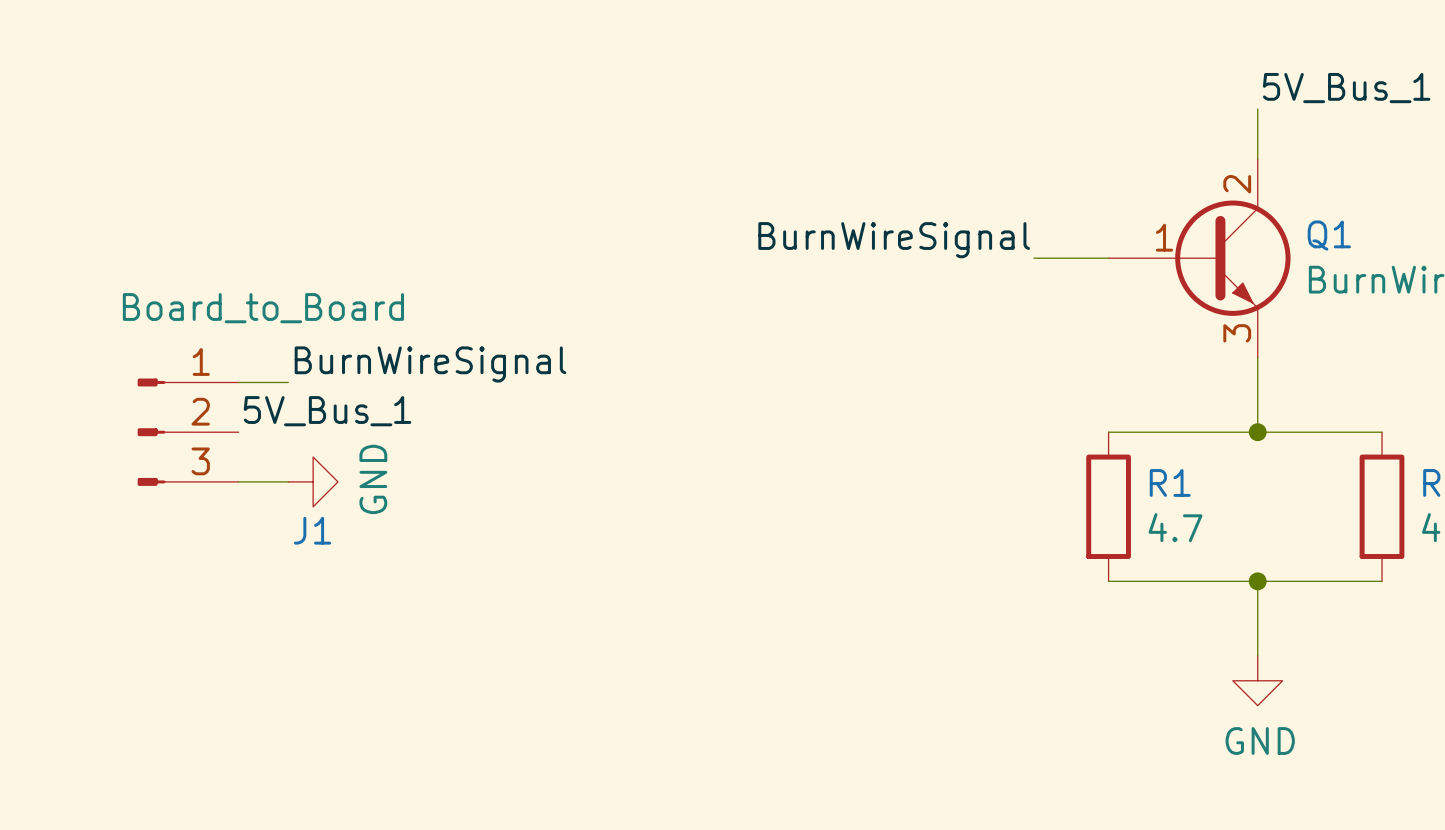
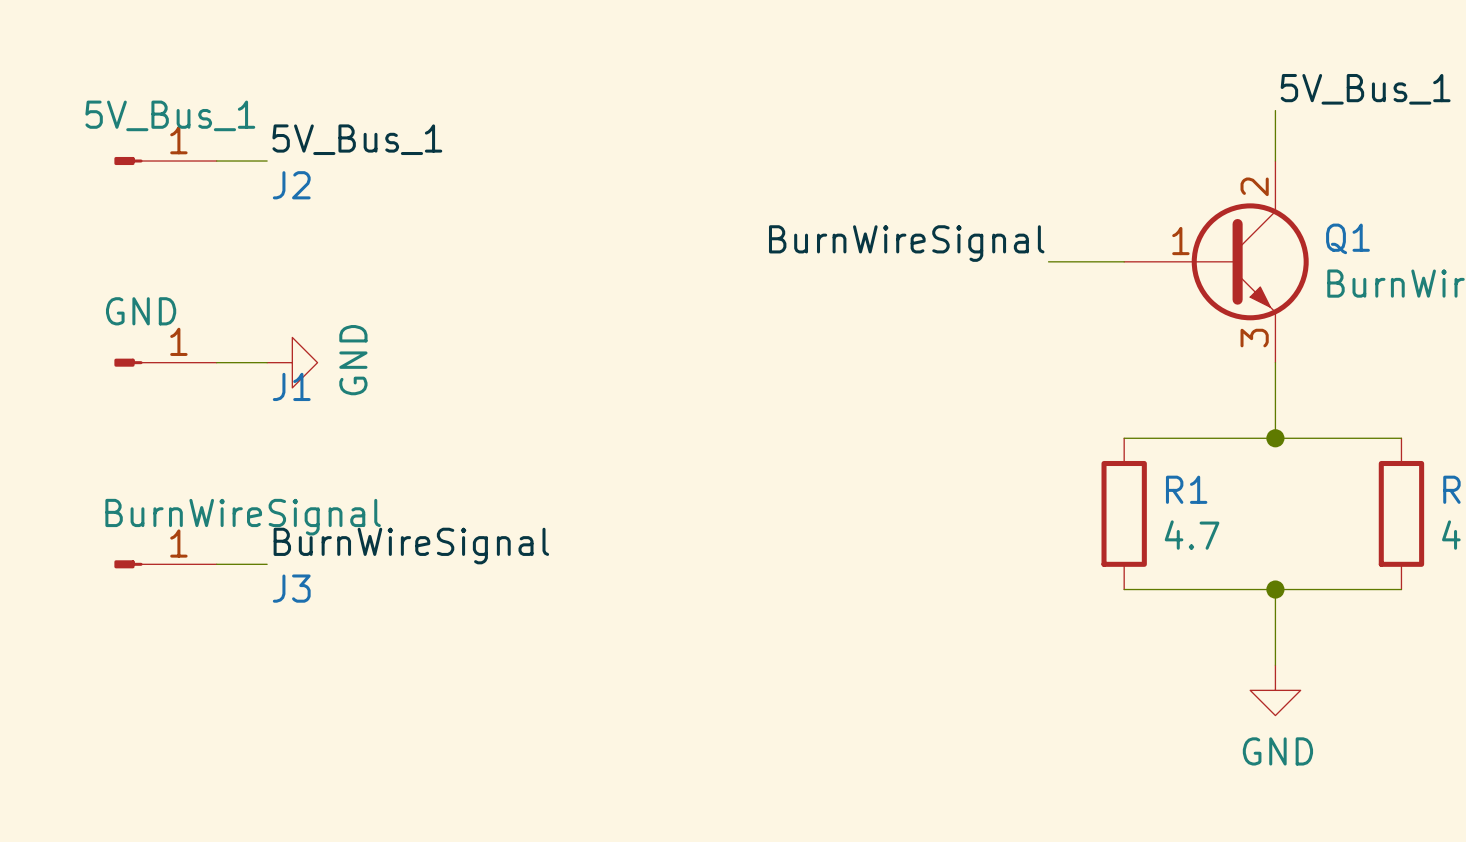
J2: none -> 5V_Bus_1 (165, 161)
wire: none -> (216, 161) (267, 161)
J1 value: Board_to_Board (263, 308) -> GND (141, 311)
label position: BurnWireSignal (430, 364) -> BurnWireSignal (411, 546)
J1 symbol: [137, 378, 239, 486] -> [114, 358, 217, 367]
wire: (238, 382) (288, 382) -> (216, 362) (267, 362)
label position: 5V_Bus_1 (327, 411) -> 5V_Bus_1 (357, 139)
wire: (238, 481) (288, 481) -> (216, 564) (267, 564)
power symbol position: GND (313, 481) -> GND (292, 362)
J1 name position: J1 (312, 530) -> J1 (291, 386)
J3: none -> BurnWireSignal (165, 564)

